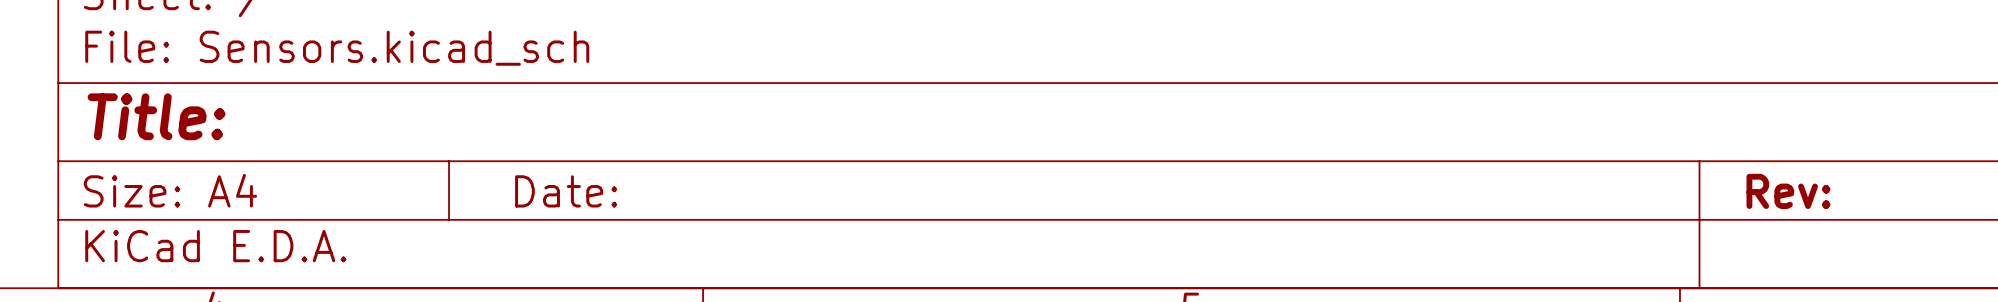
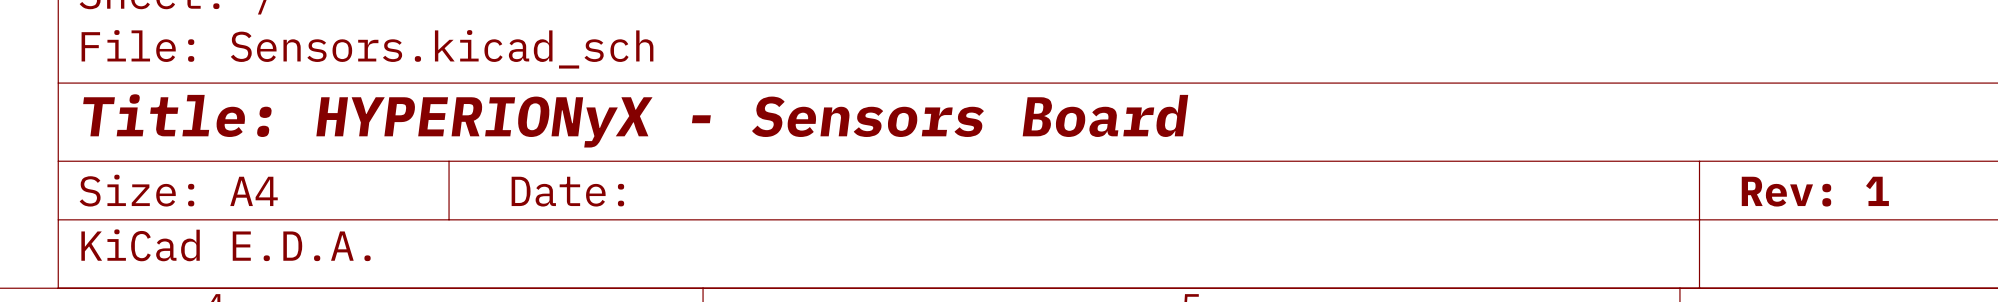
title block: Title: (156, 116) -> Title: HYPERIONyX - Sensors Board (635, 120)
title block: Rev: (1788, 191) -> Rev: 1 (1815, 191)

